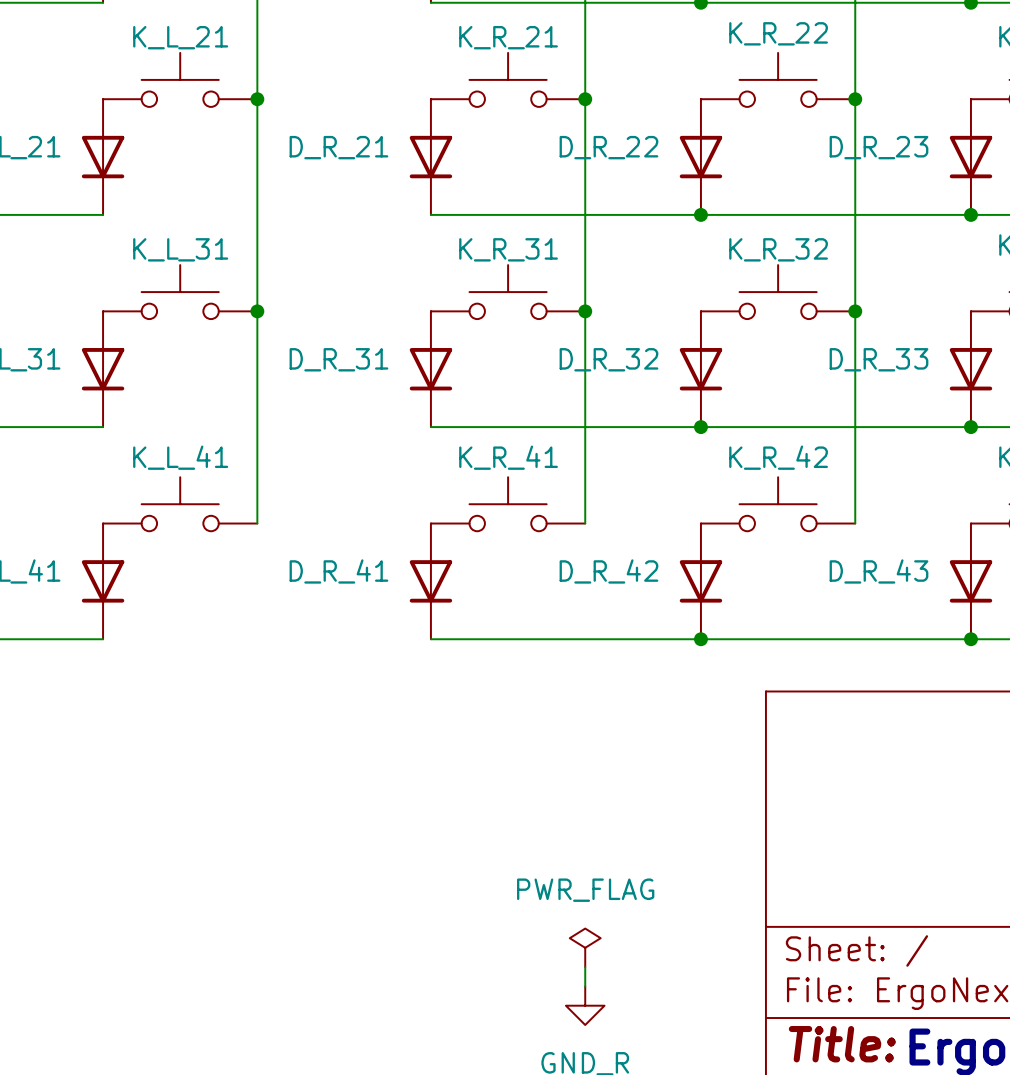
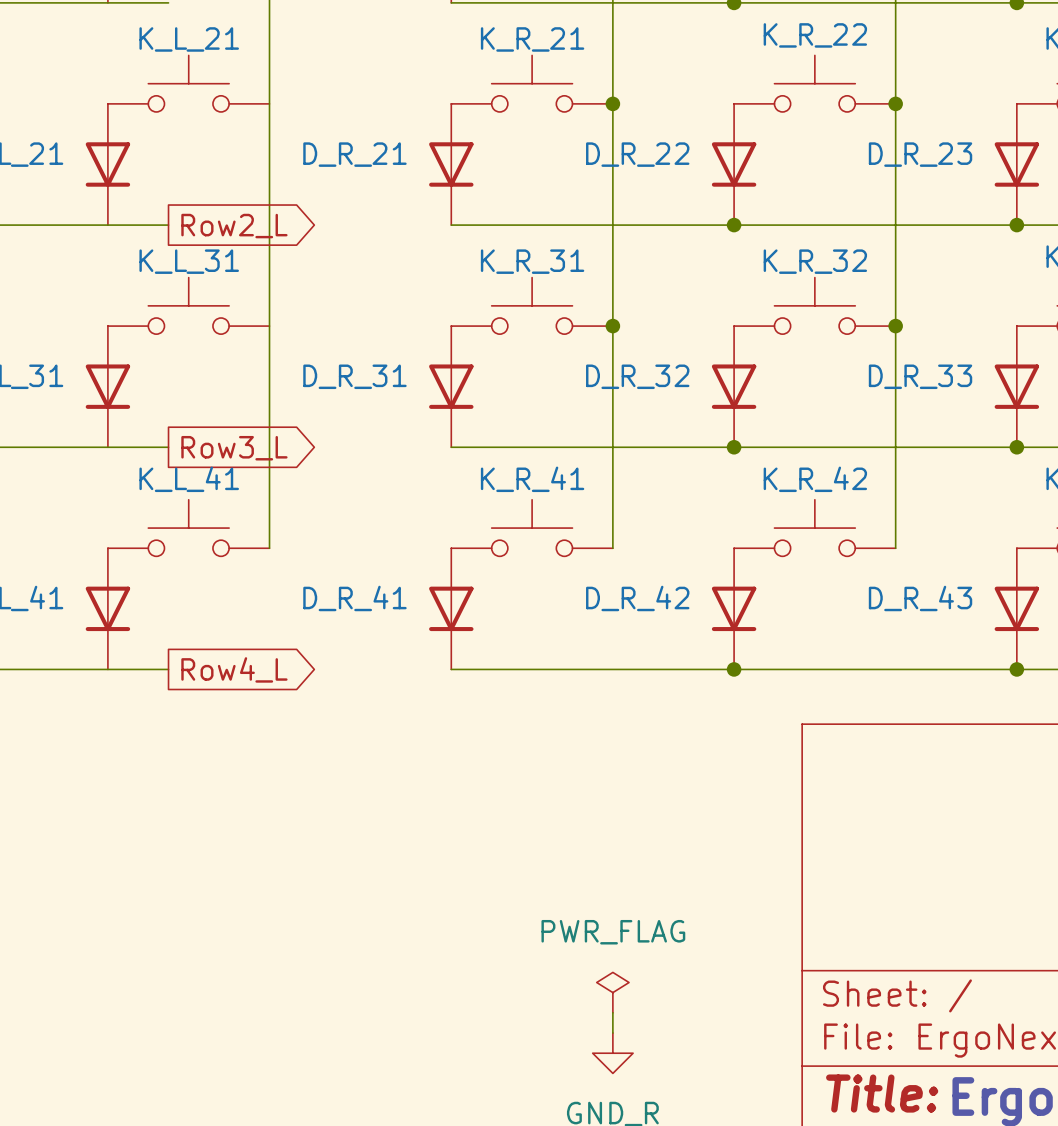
wire: none -> (107, 2) (168, 2)
junction: (257, 99) -> none
wire: none -> (107, 225) (168, 225)
global label: none -> Row2_L (234, 226)
junction: (257, 311) -> none
wire: none -> (107, 447) (168, 447)
global label: none -> Row3_L (234, 448)
wire: none -> (107, 669) (168, 669)
global label: none -> Row4_L (234, 669)

